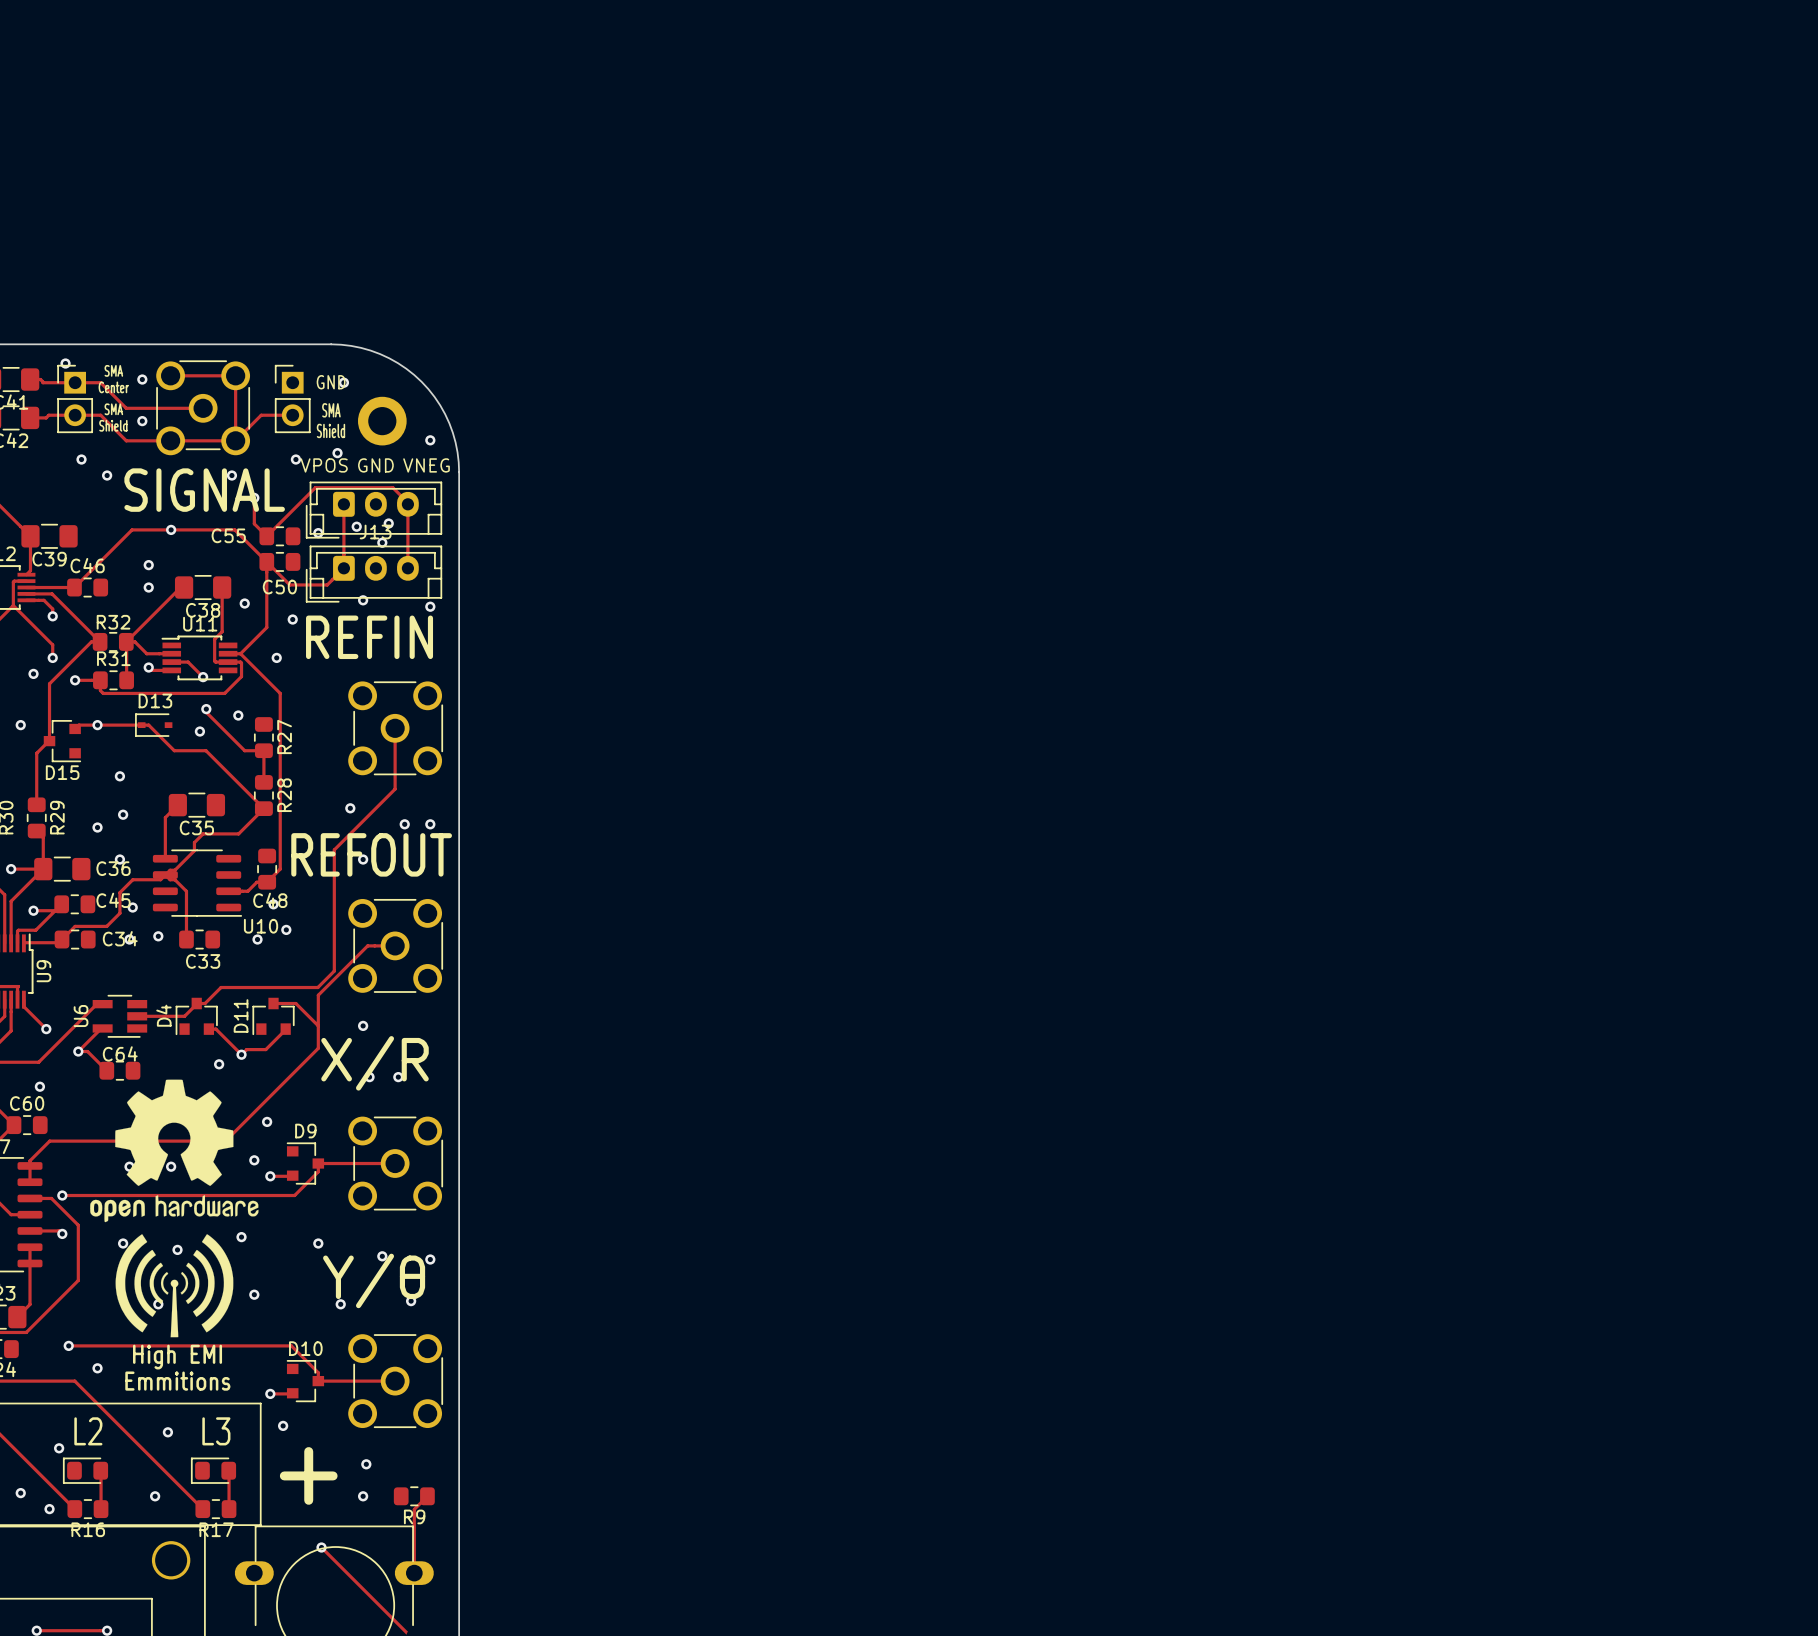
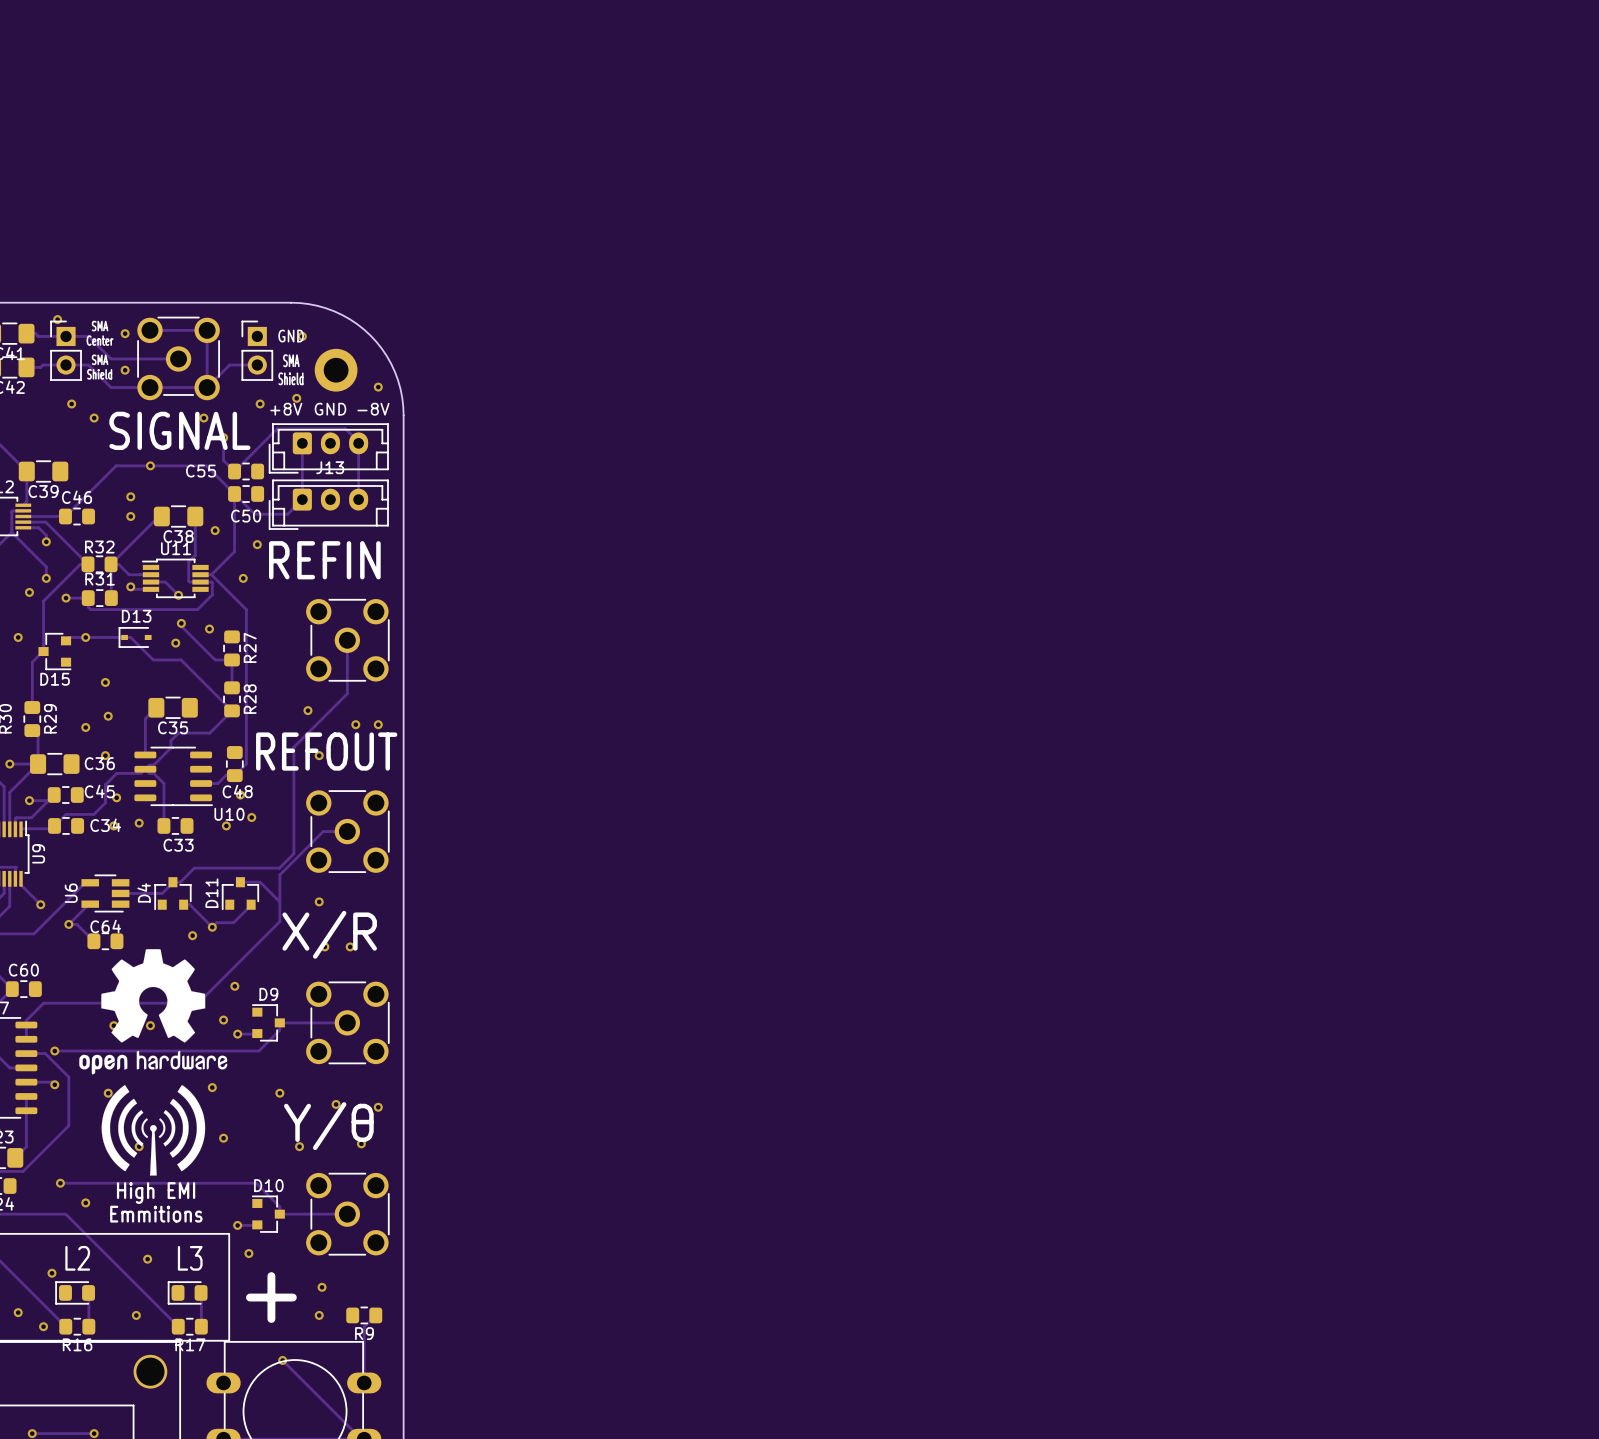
text: VPOS (324, 465) -> +8V (286, 409)
text: VNEG (426, 465) -> -8V (373, 409)
via: (388, 523) -> none
via: (356, 526) -> none
via: (318, 533) -> none
via: (382, 542) -> none
via: (363, 600) -> none
via: (430, 606) -> none
via: (39, 1086) -> none
via: (177, 1249) -> none

